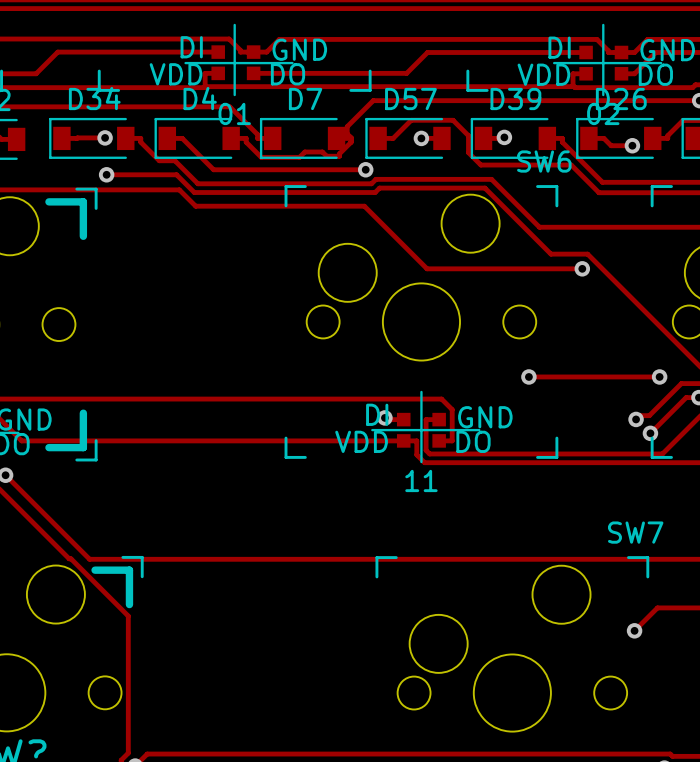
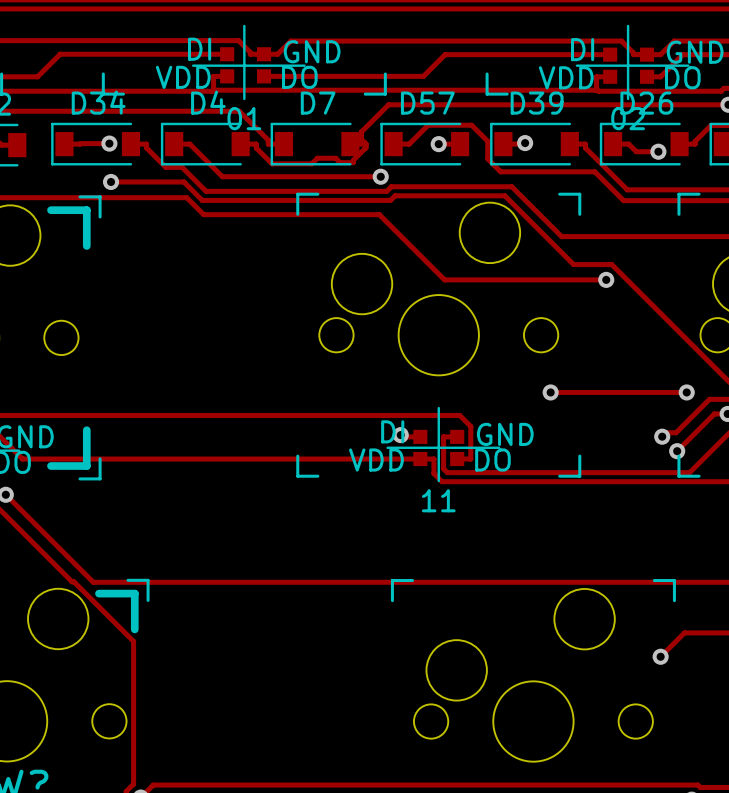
SW6 name: SW6 (544, 161) -> none
SW7 name: SW7 (635, 532) -> none

